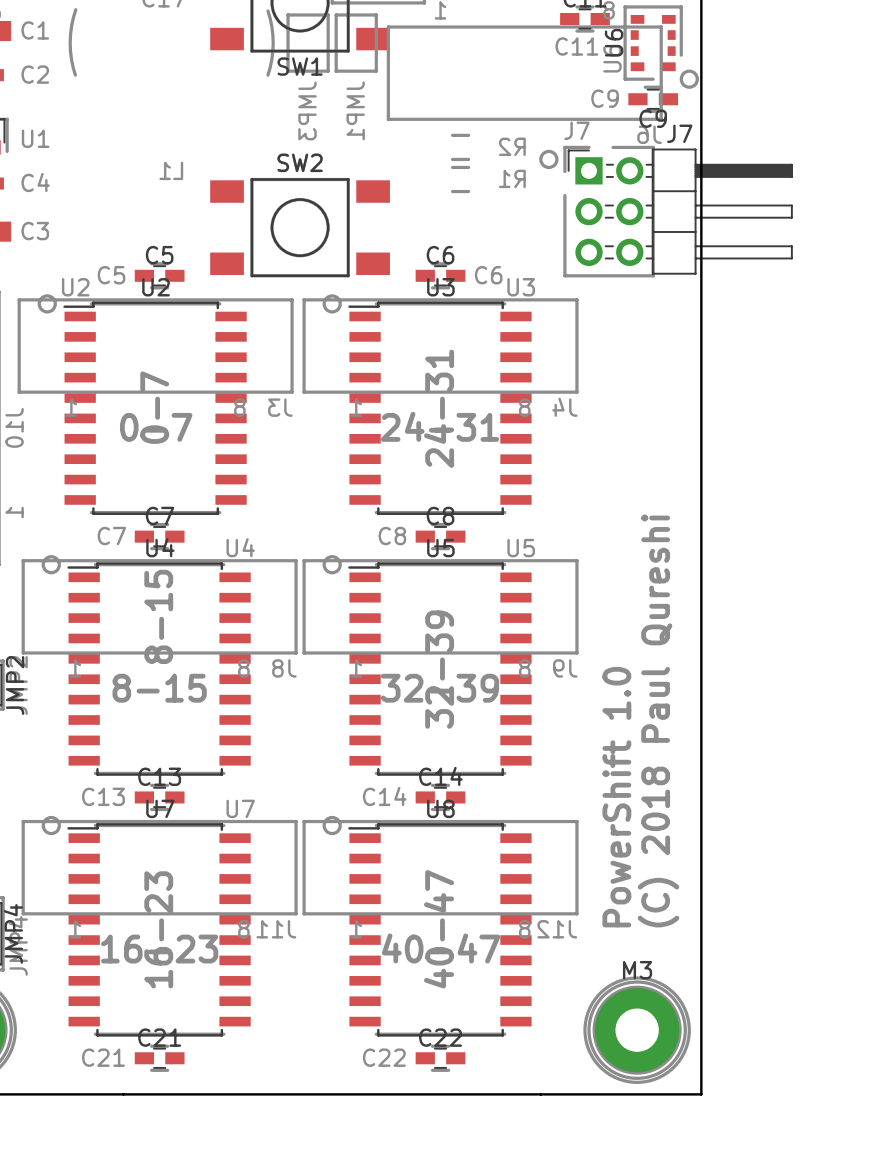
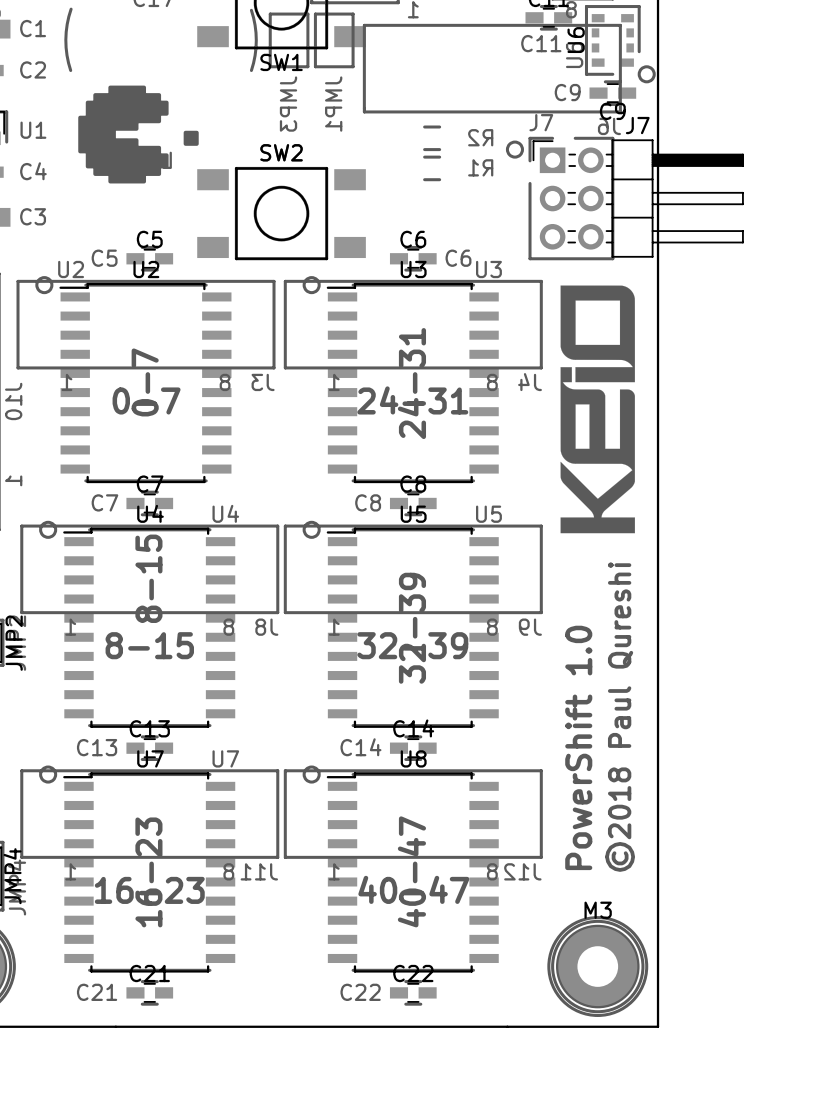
drawing: none -> [78, 85, 199, 184]
drawing: none -> [560, 285, 635, 534]
text: (C) 2018 Paul Qureshi (658, 720) -> ©2018 Paul Qureshi (620, 717)

